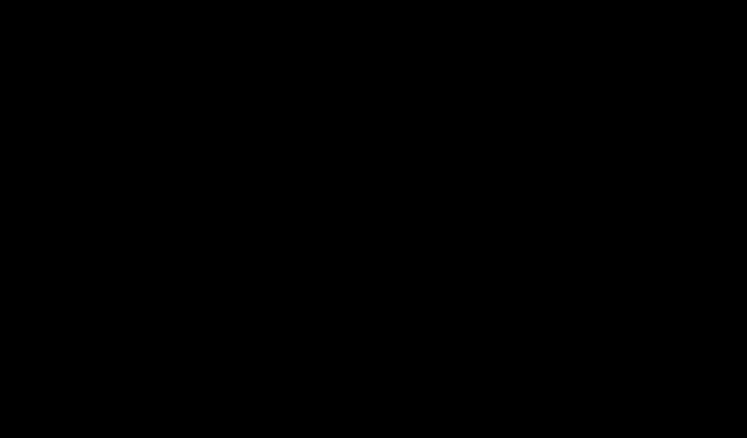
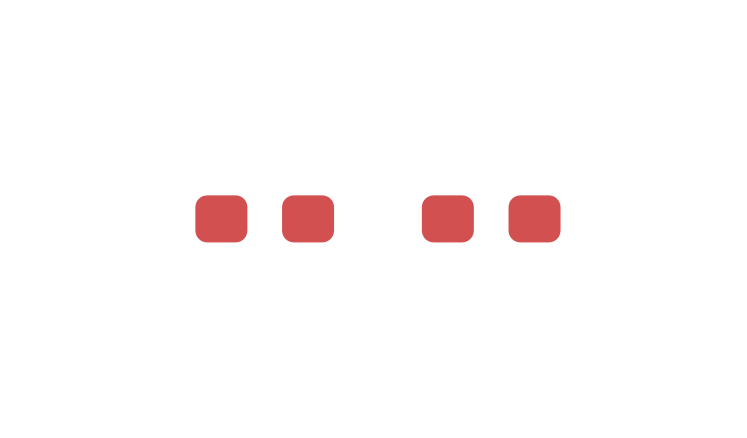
part: none -> (264, 218)
part: none -> (491, 218)

